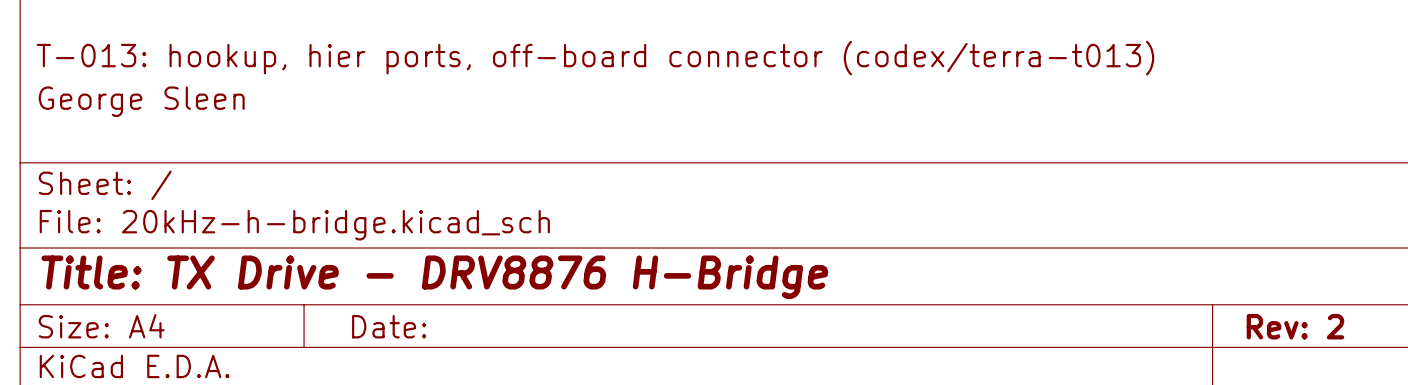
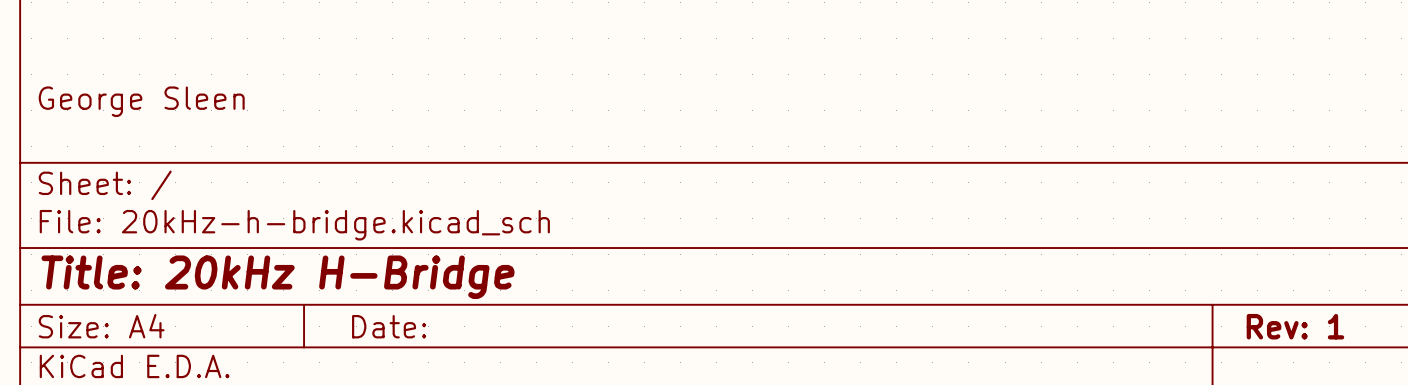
title block: T-013: hookup, hier ports, off-board connector (codex/terra-t013) (595, 58) -> none
title block: Title: TX Drive - DRV8876 H-Bridge (434, 277) -> Title: 20kHz H-Bridge (278, 277)
title block: Rev: 2 (1295, 326) -> Rev: 1 (1295, 326)

